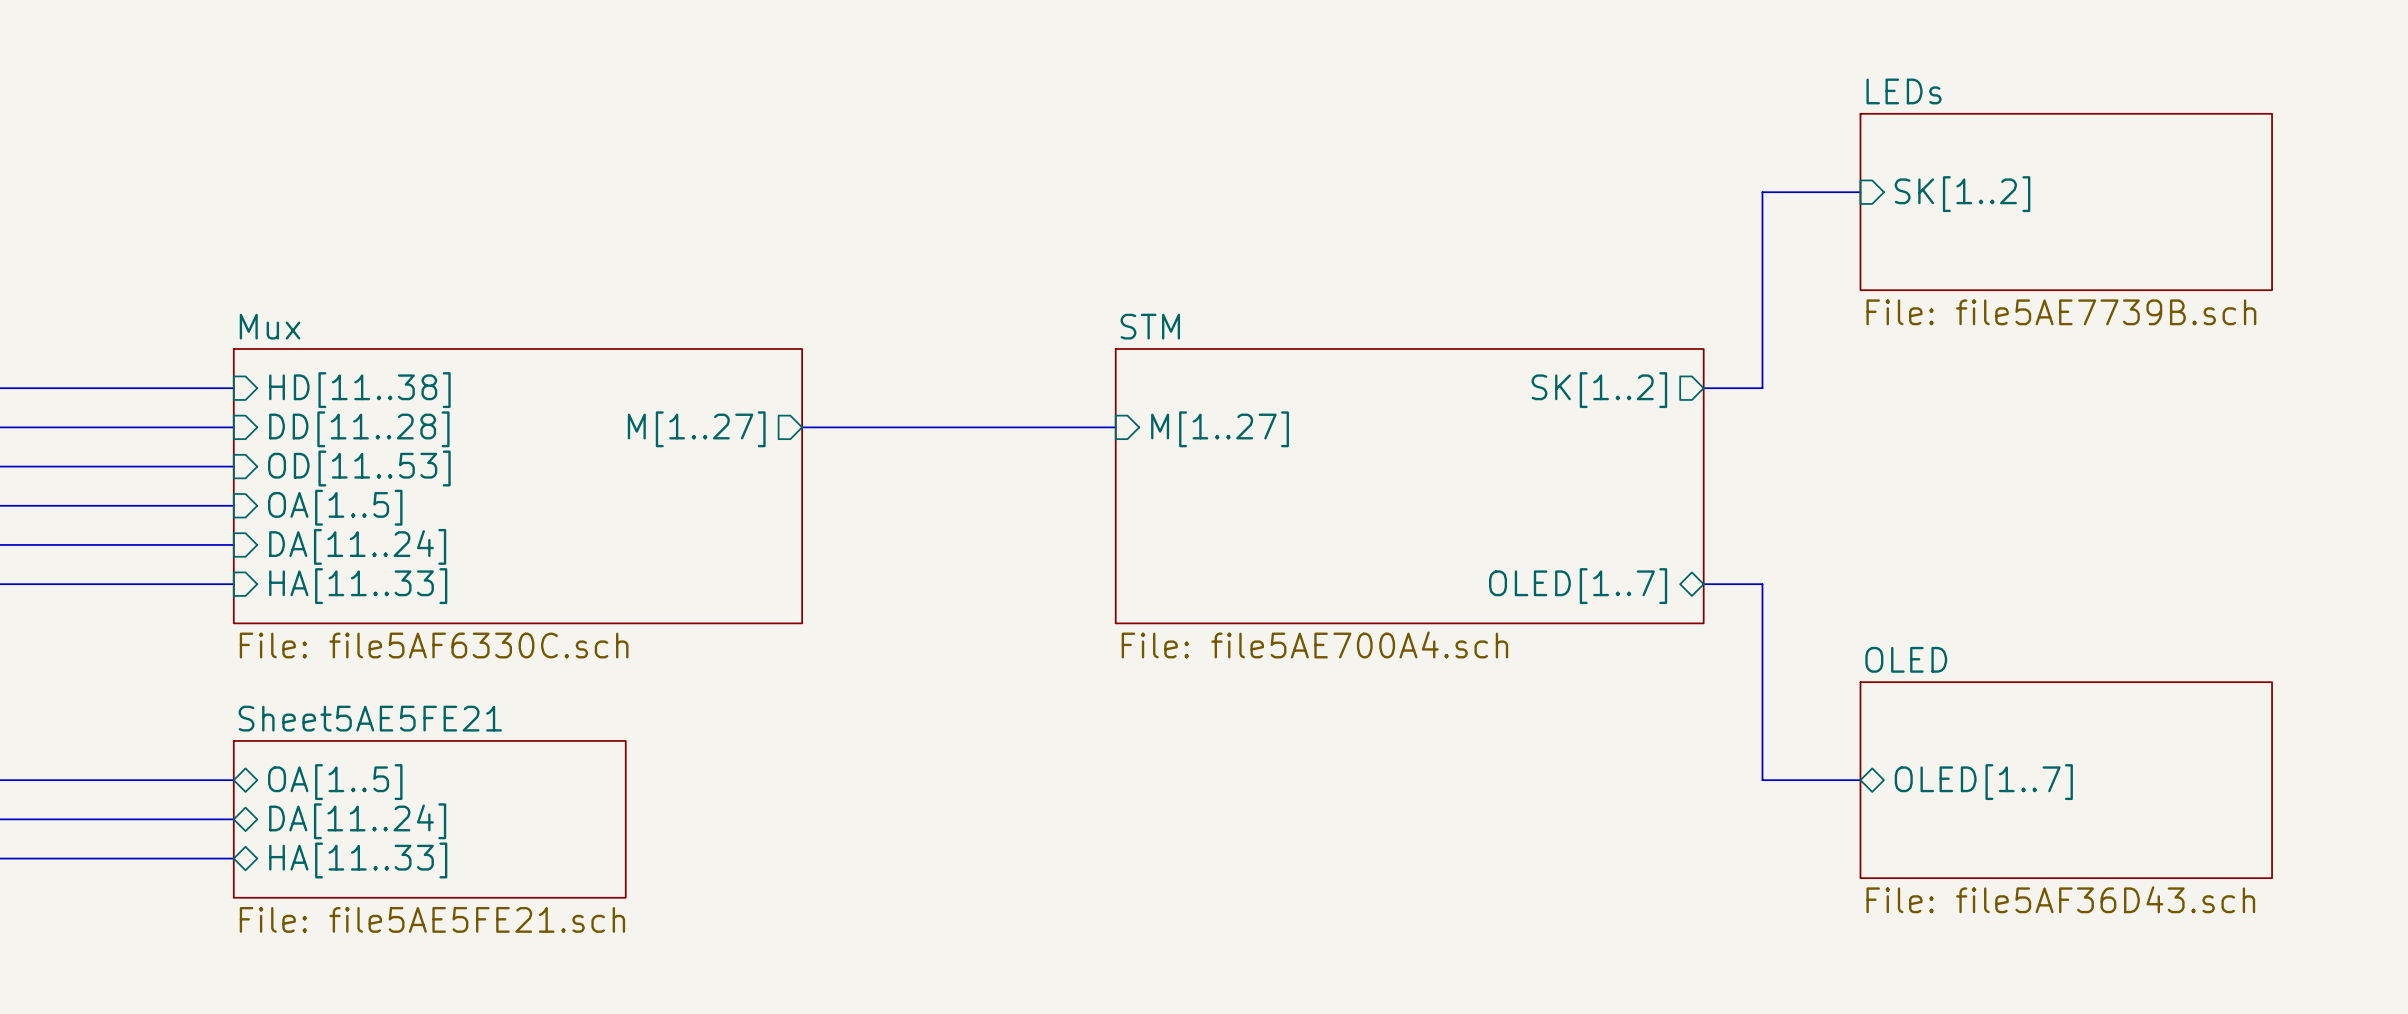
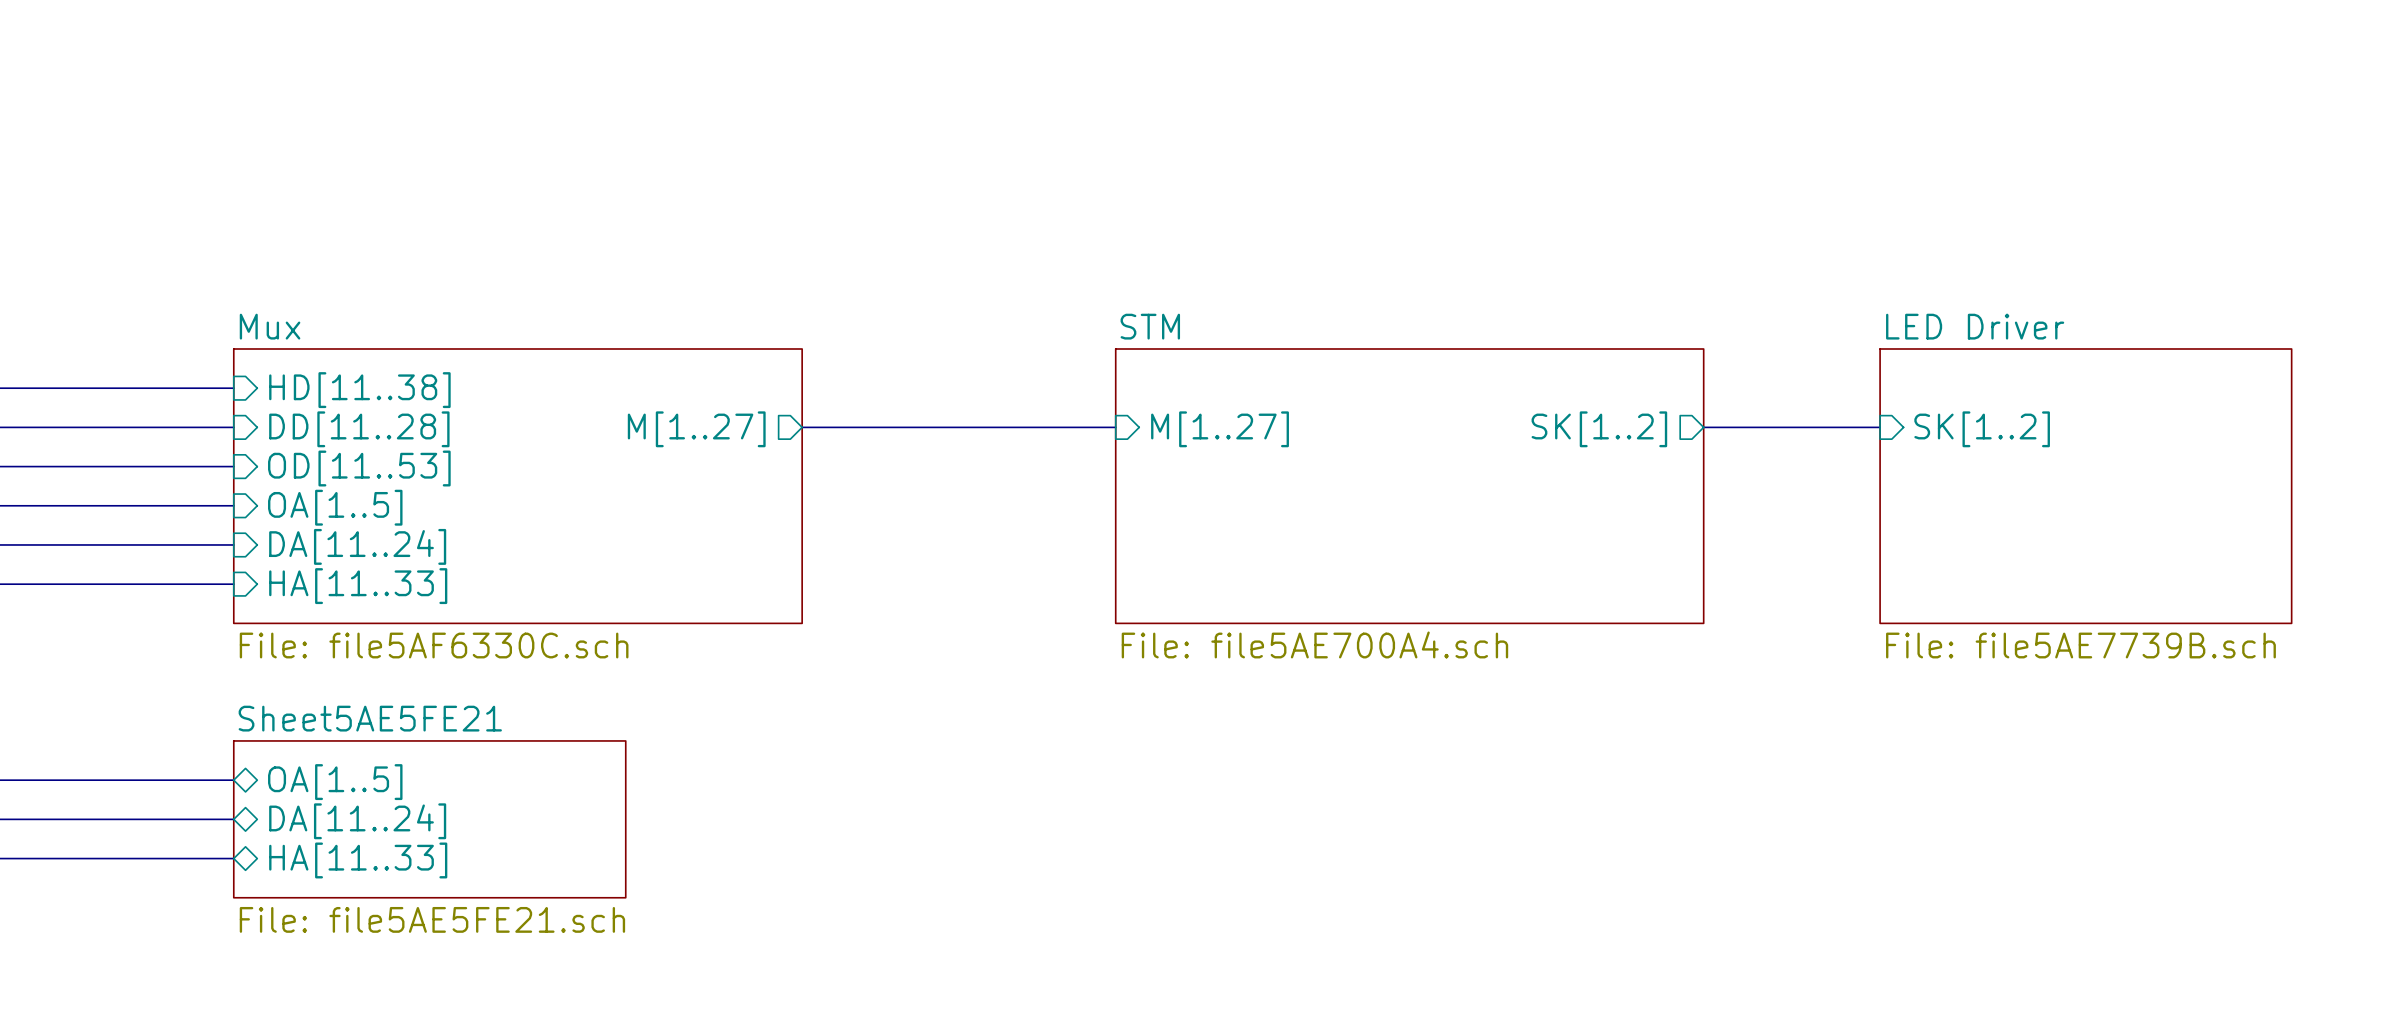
bus: (1860, 192) (1762, 192) (1762, 388) (1703, 388) -> none
sheet pin: SK[1..2] (1962, 194) -> none
sheet LEDs: File: file5AE7739B.sch (2066, 202) -> none
sheet pin position: SK[1..2] (1599, 390) -> SK[1..2] (1599, 429)
bus: none -> (1703, 427) (1880, 427)
sheet pin: none -> SK[1..2] (1982, 429)
sheet LED Driver: none -> File: file5AE7739B.sch (2085, 486)
bus: (1703, 584) (1762, 584) (1762, 780) (1860, 780) -> none
sheet pin: OLED[1..7] (1578, 586) -> none
sheet OLED: File: file5AF36D43.sch (2066, 780) -> none
sheet pin: OLED[1..7] (1983, 782) -> none

